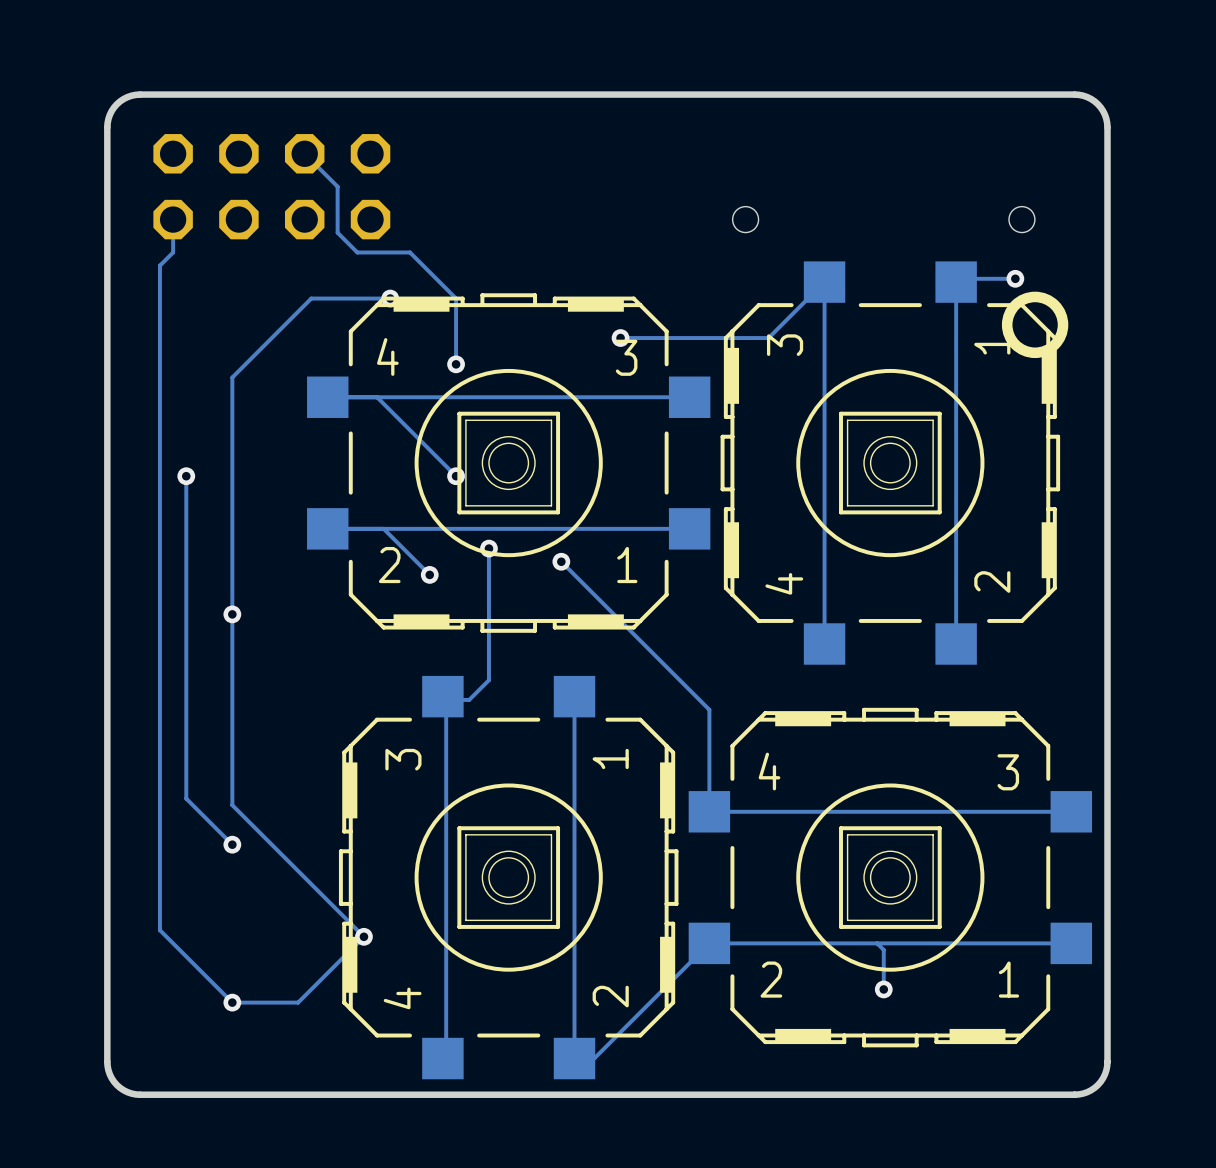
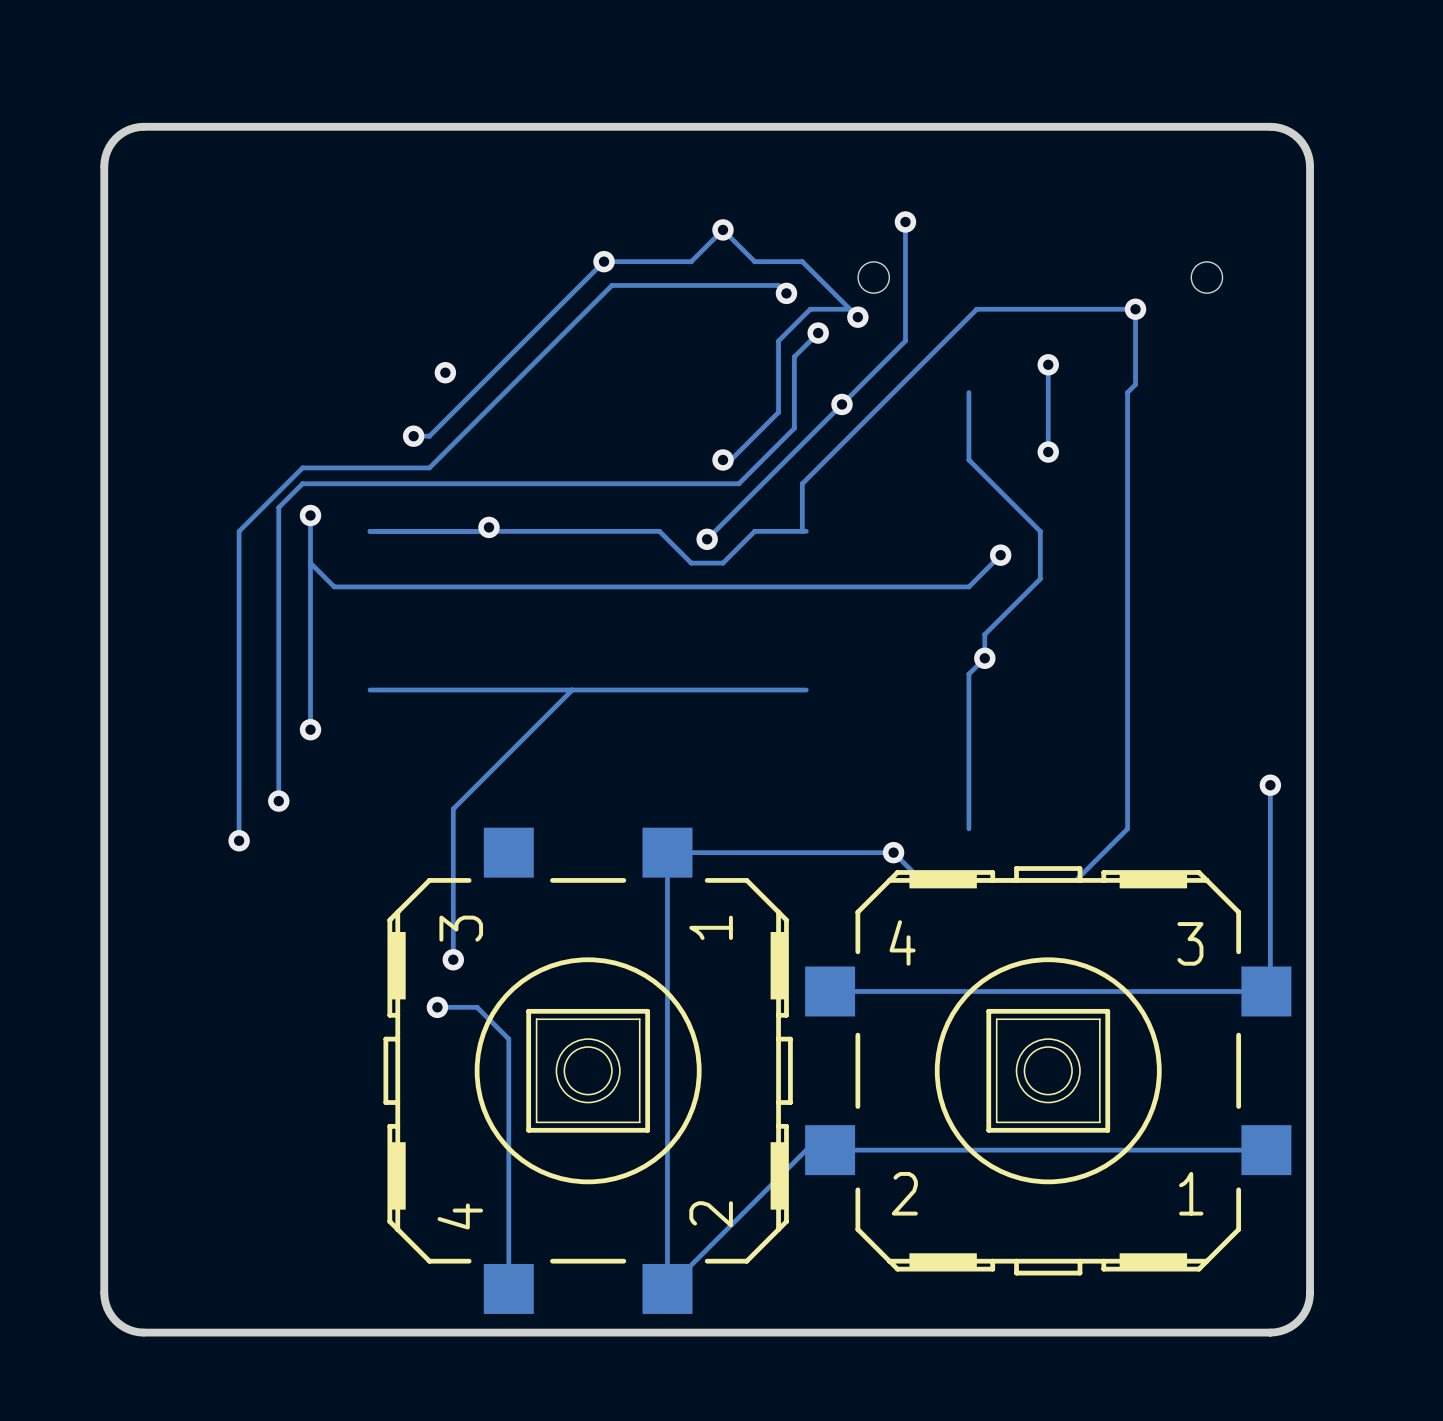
track: (304, 153) (337, 186) (337, 232) (357, 252) (410, 252) (456, 298) (456, 364) -> none
track: none -> (905, 221) (905, 340) (707, 539)
via: none -> (905, 221)
via: none -> (723, 229)
part: (271, 186) -> none
via: none -> (604, 261)
track: (173, 219) (173, 252) (159, 265) (159, 930) (232, 1002) (298, 1002) (363, 936) (232, 805) (232, 377) (311, 298) (390, 298) -> none
track: none -> (786, 293) (778, 285) (611, 285) (429, 467) (302, 467) (239, 531) (239, 840)
via: none -> (786, 293)
track: none -> (849, 309) (810, 309) (778, 340) (778, 412) (730, 459) (723, 459)
track: none -> (857, 317) (802, 261) (754, 261) (723, 229) (691, 261) (604, 261) (429, 436) (413, 436)
via: none -> (857, 317)
track: none -> (818, 333) (794, 356) (794, 428) (738, 483) (302, 483) (278, 507) (278, 801)
via: none -> (818, 333)
track: (1015, 278) (959, 278) (956, 282) (956, 314) -> (802, 531) (802, 483) (976, 309) (1135, 309) (1135, 384) (1127, 392)
via position: (1015, 278) -> (1135, 309)
track: none -> (1048, 364) (1048, 452)
via: none -> (1048, 364)
drawing: [1001, 291, 1069, 359] -> none
track: (824, 314) (824, 282) (768, 338) (620, 338) -> none
via: none -> (842, 404)
via position: (620, 338) -> (723, 459)
via: none -> (413, 436)
via: (456, 364) -> none
via: none -> (1048, 452)
track: (824, 370) (824, 548) -> (968, 459) (1040, 531) (1040, 578) (984, 634) (984, 658) (968, 674)
track: (377, 397) (456, 476) -> none
track: (689, 397) (327, 397) -> none
track: none -> (310, 515) (310, 729)
via: none -> (310, 515)
via: none -> (488, 527)
track: none -> (806, 531) (754, 531) (723, 563) (691, 563) (659, 531) (370, 531)
via: none -> (707, 539)
track: none -> (1000, 555) (968, 586) (334, 586) (310, 563)
via: none -> (1000, 555)
part: (508, 463) -> none
part: (890, 463) -> none
track: (186, 476) (186, 798) (232, 844) -> none
via: (186, 476) -> none
via: (456, 476) -> none
track: (383, 528) (429, 574) -> none
track: (689, 528) (327, 528) -> (806, 690) (370, 690)
via: none -> (984, 658)
track: (488, 548) (488, 680) (469, 699) (446, 699) (446, 1055) (442, 1058) -> (437, 1007) (477, 1007) (508, 1039) (508, 1288)
via: (488, 548) -> none
track: none -> (572, 690) (453, 809) (453, 959)
track: (561, 561) (709, 709) (709, 811) -> none
via: (561, 561) -> none
via: (429, 574) -> none
via: none -> (310, 729)
via: (232, 614) -> none
track: none -> (1270, 785) (1270, 987) (1266, 991)
via: none -> (1270, 785)
track: none -> (968, 789) (968, 828)
track: none -> (1127, 789) (1127, 828) (1076, 880) (921, 880) (893, 852) (667, 852)
via: none -> (278, 801)
via: none -> (239, 840)
via: none -> (893, 852)
via: none -> (453, 959)
via: none -> (437, 1007)
via: (232, 844) -> none
via: (363, 936) -> none
track: (709, 943) (594, 1058) (574, 1058) -> (830, 1150) (806, 1150) (667, 1288)
track: (877, 943) (883, 949) (883, 989) -> none
via: (883, 989) -> none
via: (232, 1002) -> none

